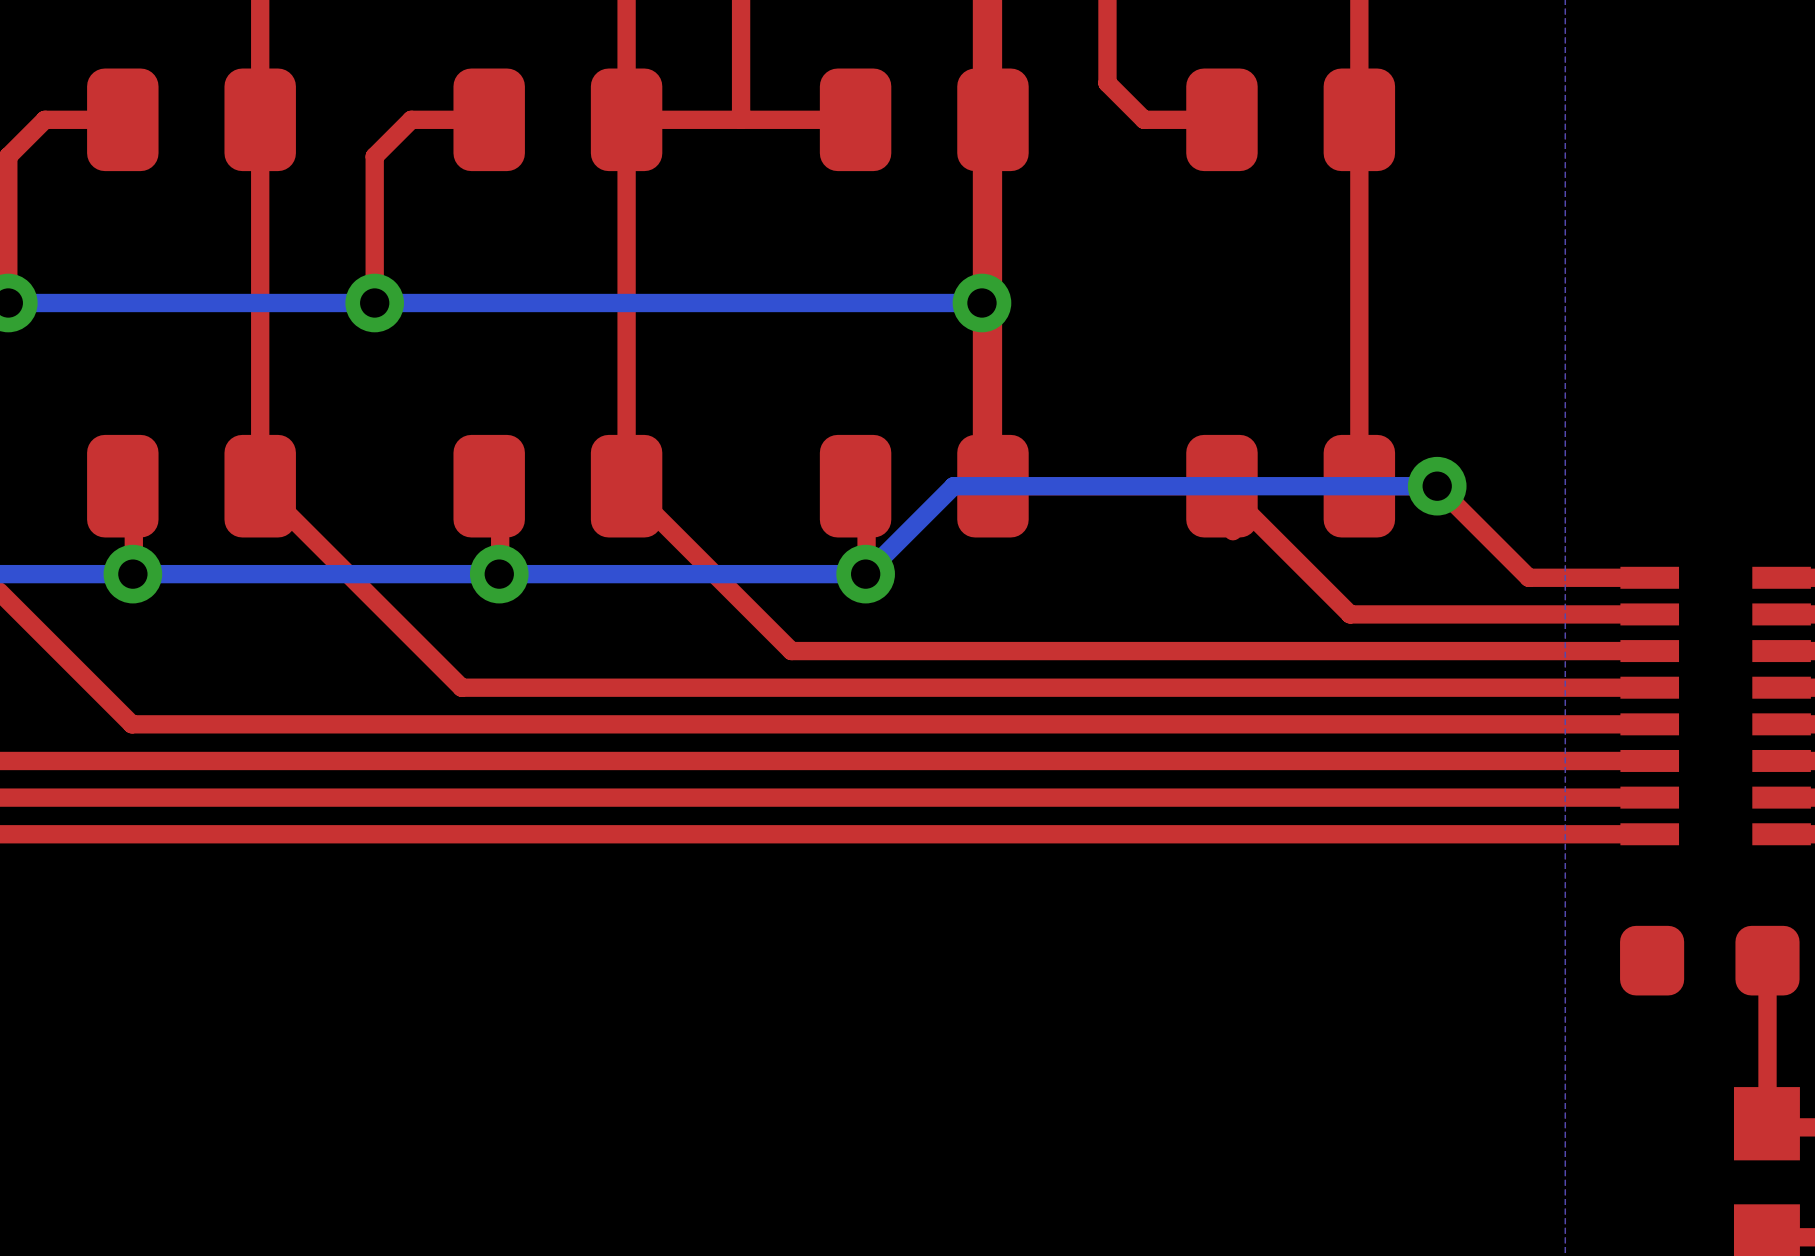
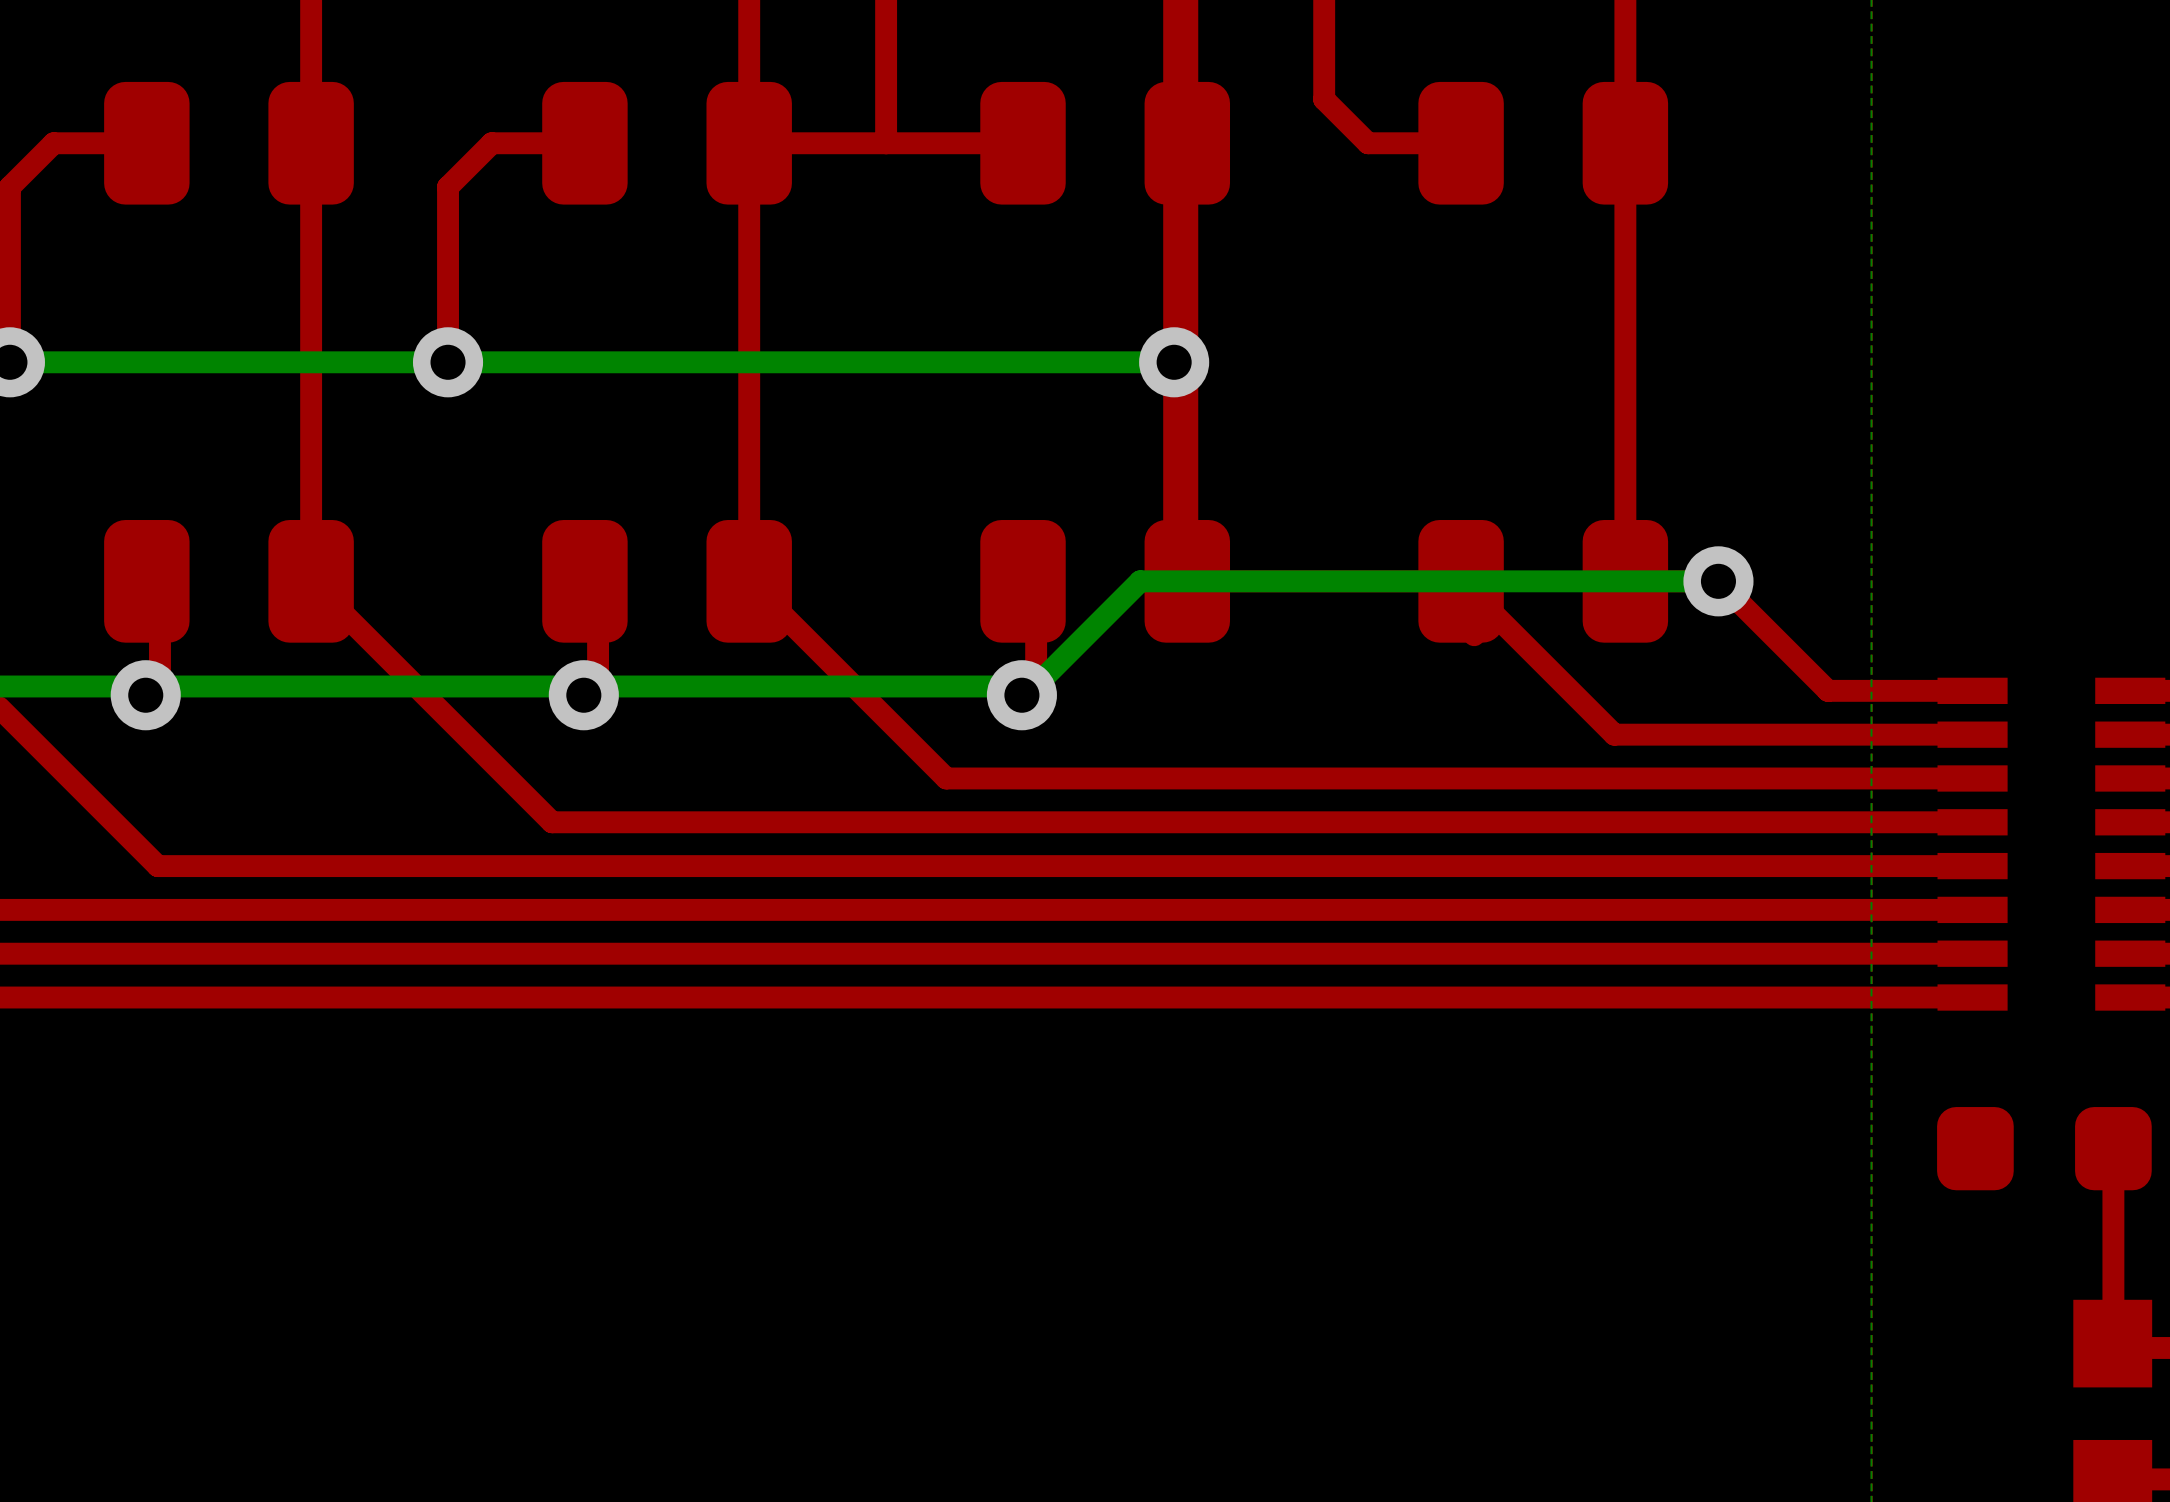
via position: (132, 574) -> (145, 695)
via position: (499, 574) -> (583, 695)
via position: (865, 574) -> (1021, 695)

